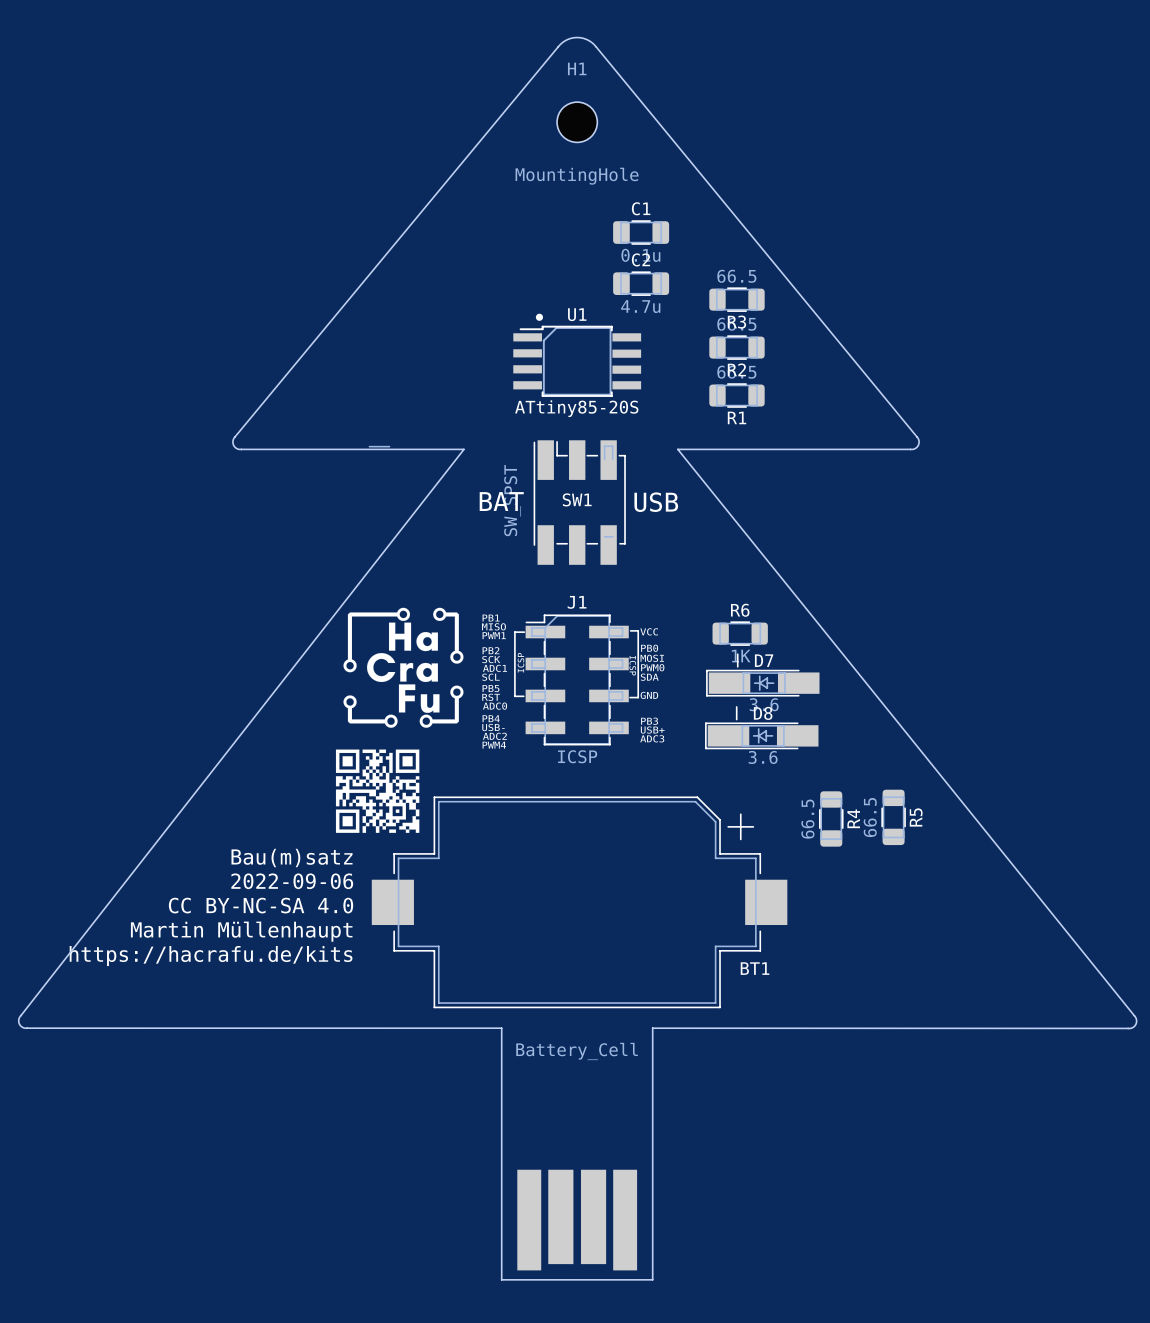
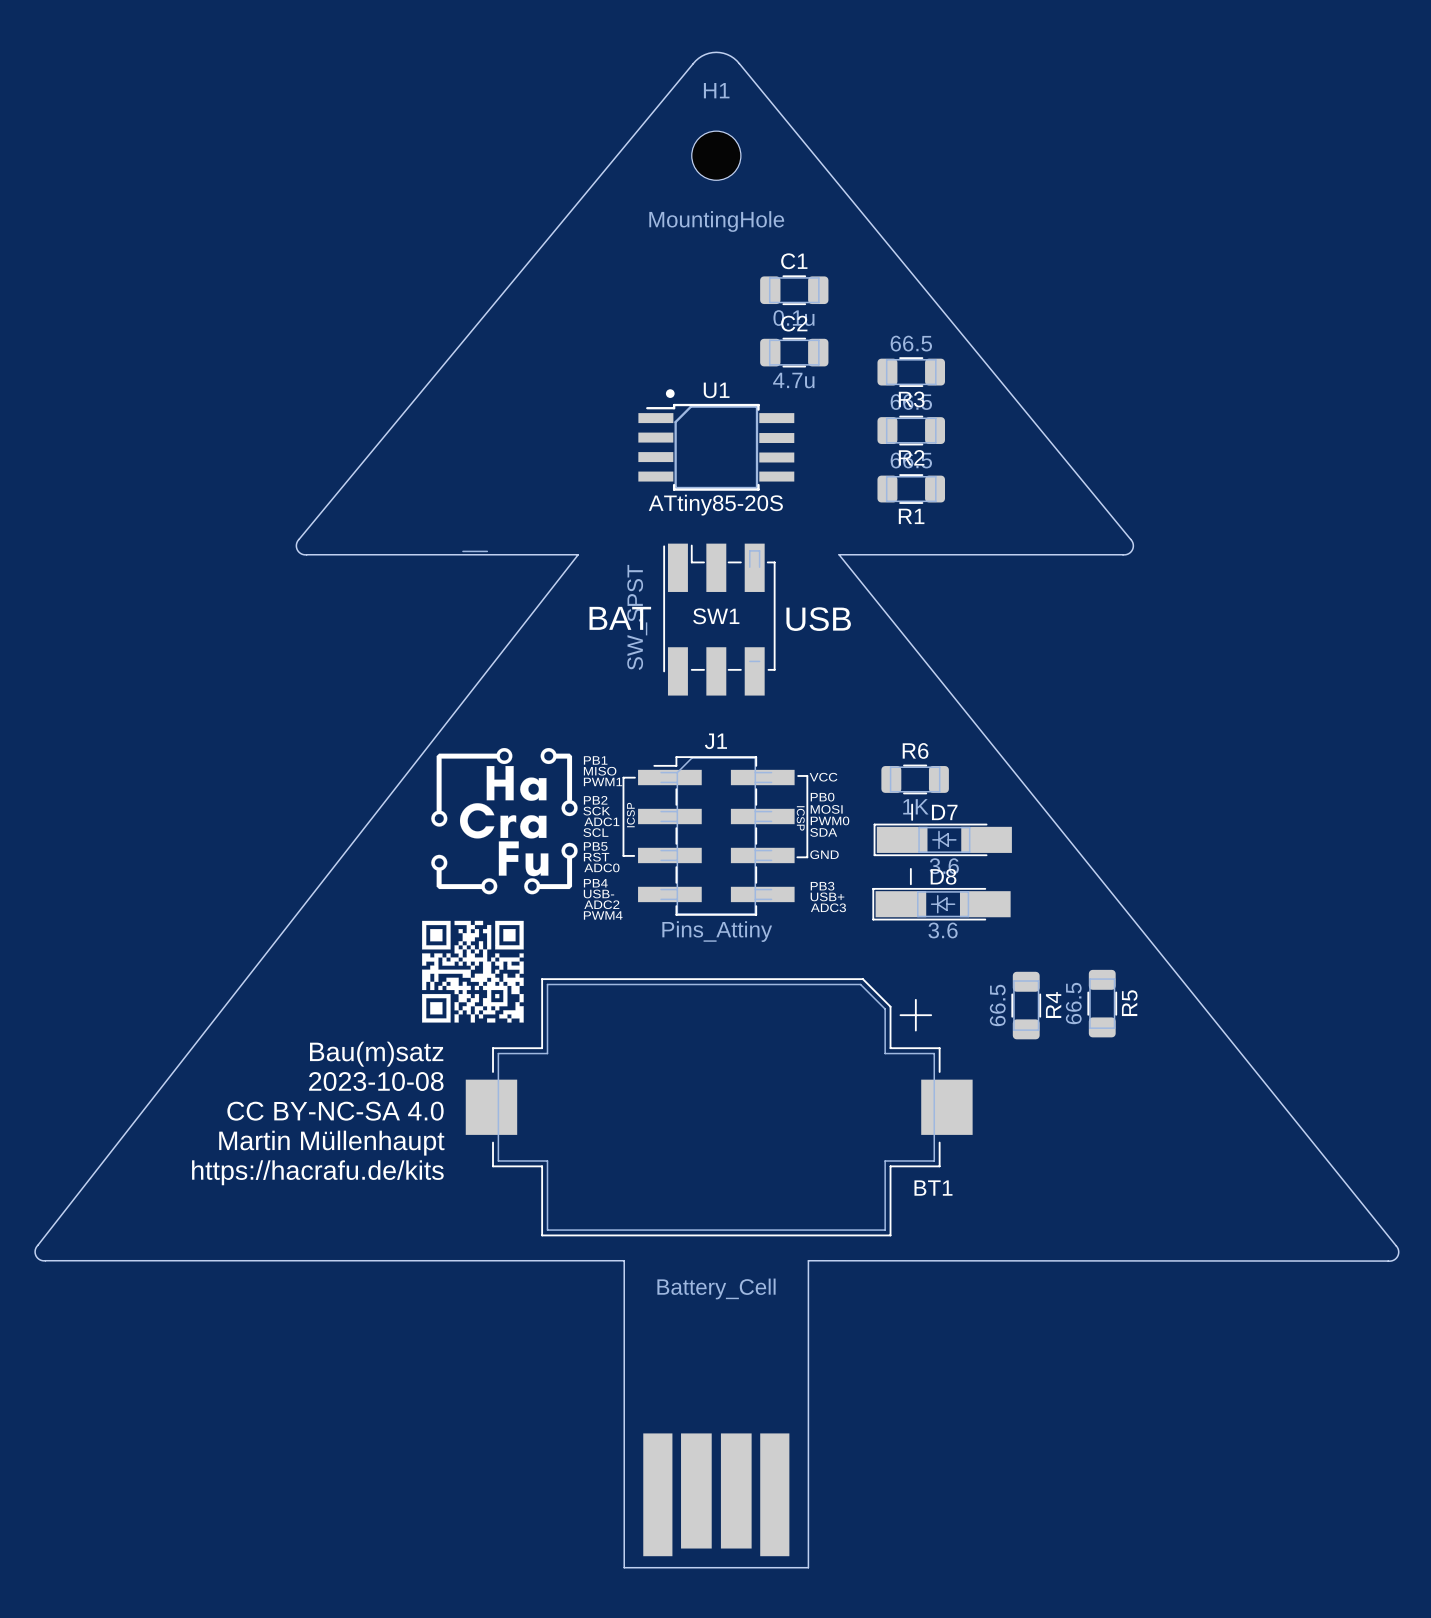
J1 footprint: [514, 614, 639, 746] -> [622, 756, 809, 916]
J1 value: ICSP (577, 756) -> Pins_Attiny (717, 931)
text: 2022-09-06 (292, 881) -> 2023-10-08 (376, 1081)

